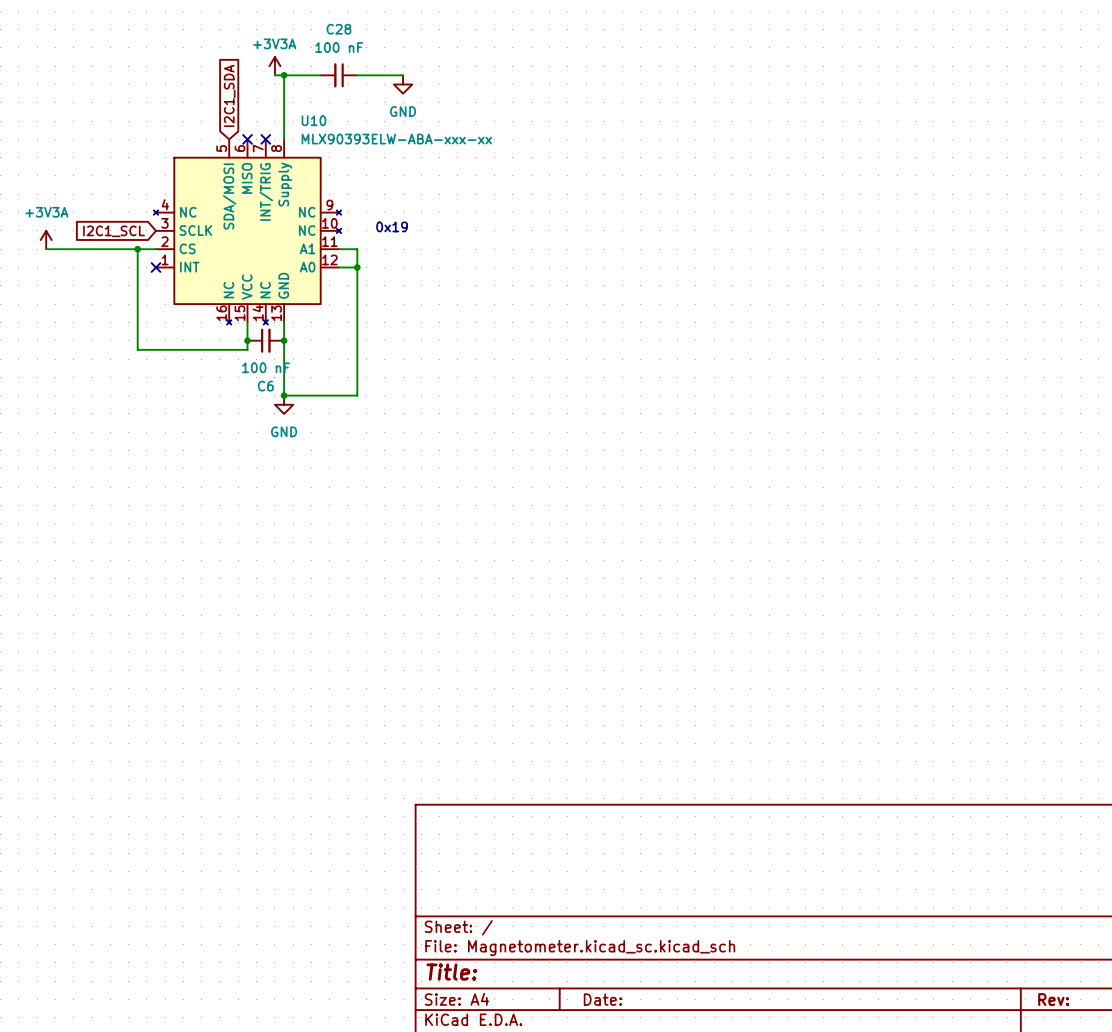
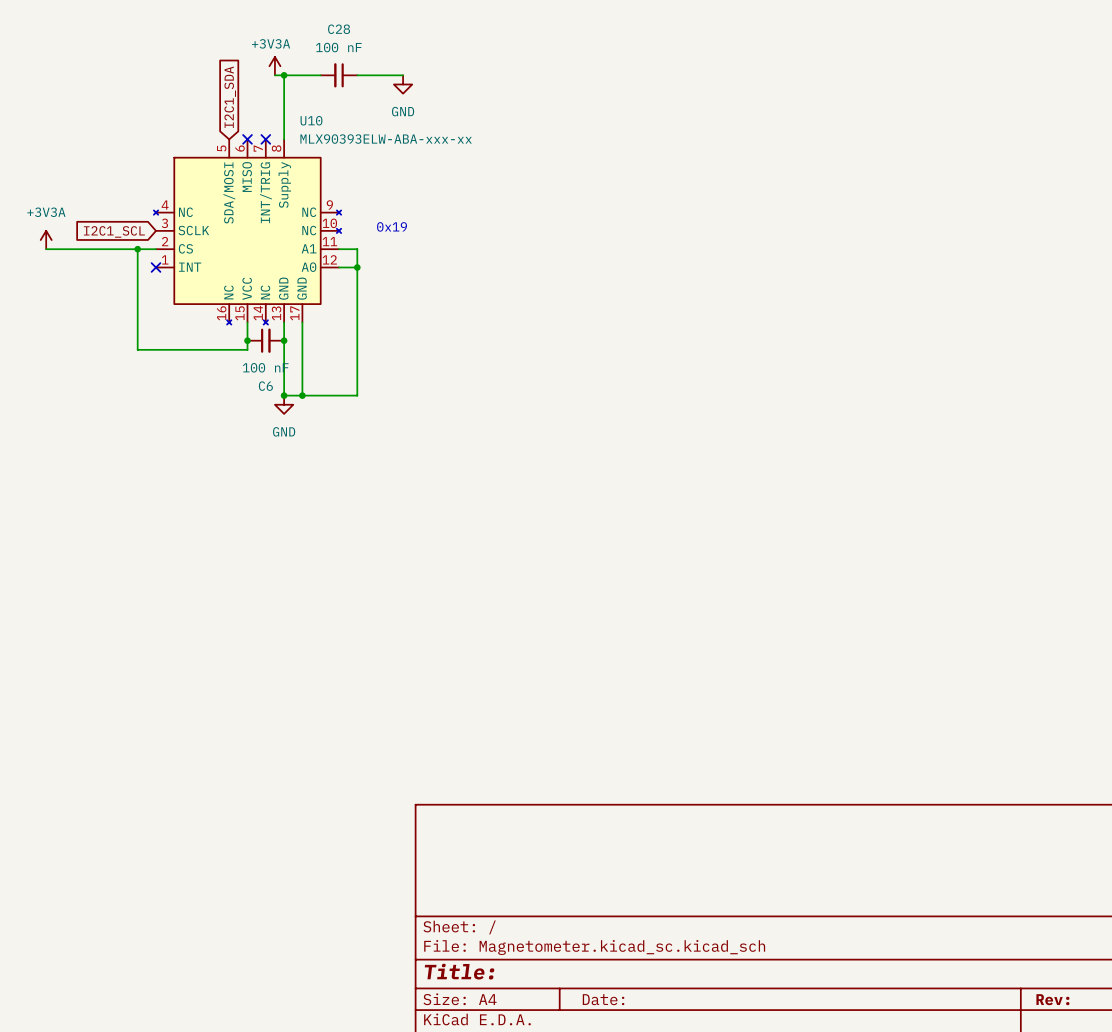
U10 symbol: [153, 139, 342, 325] -> [153, 139, 342, 325]
wire: none -> (302, 322) (302, 395)
junction: none -> (302, 395)

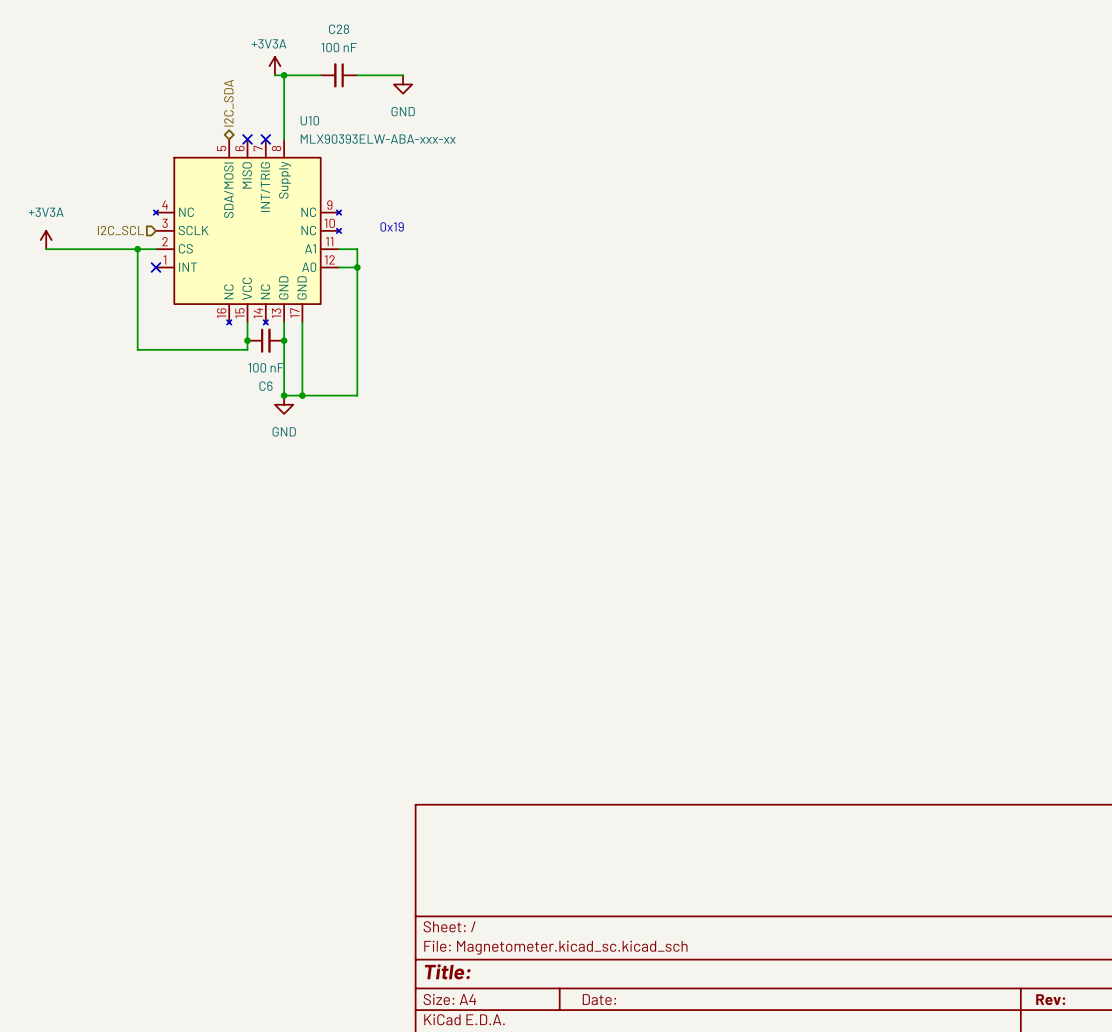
global label: I2C1_SDA (230, 97) -> none
hierarchical label: none -> I2C_SDA (228, 103)
global label: I2C1_SCL (114, 231) -> none
hierarchical label: none -> I2C_SCL (120, 230)

